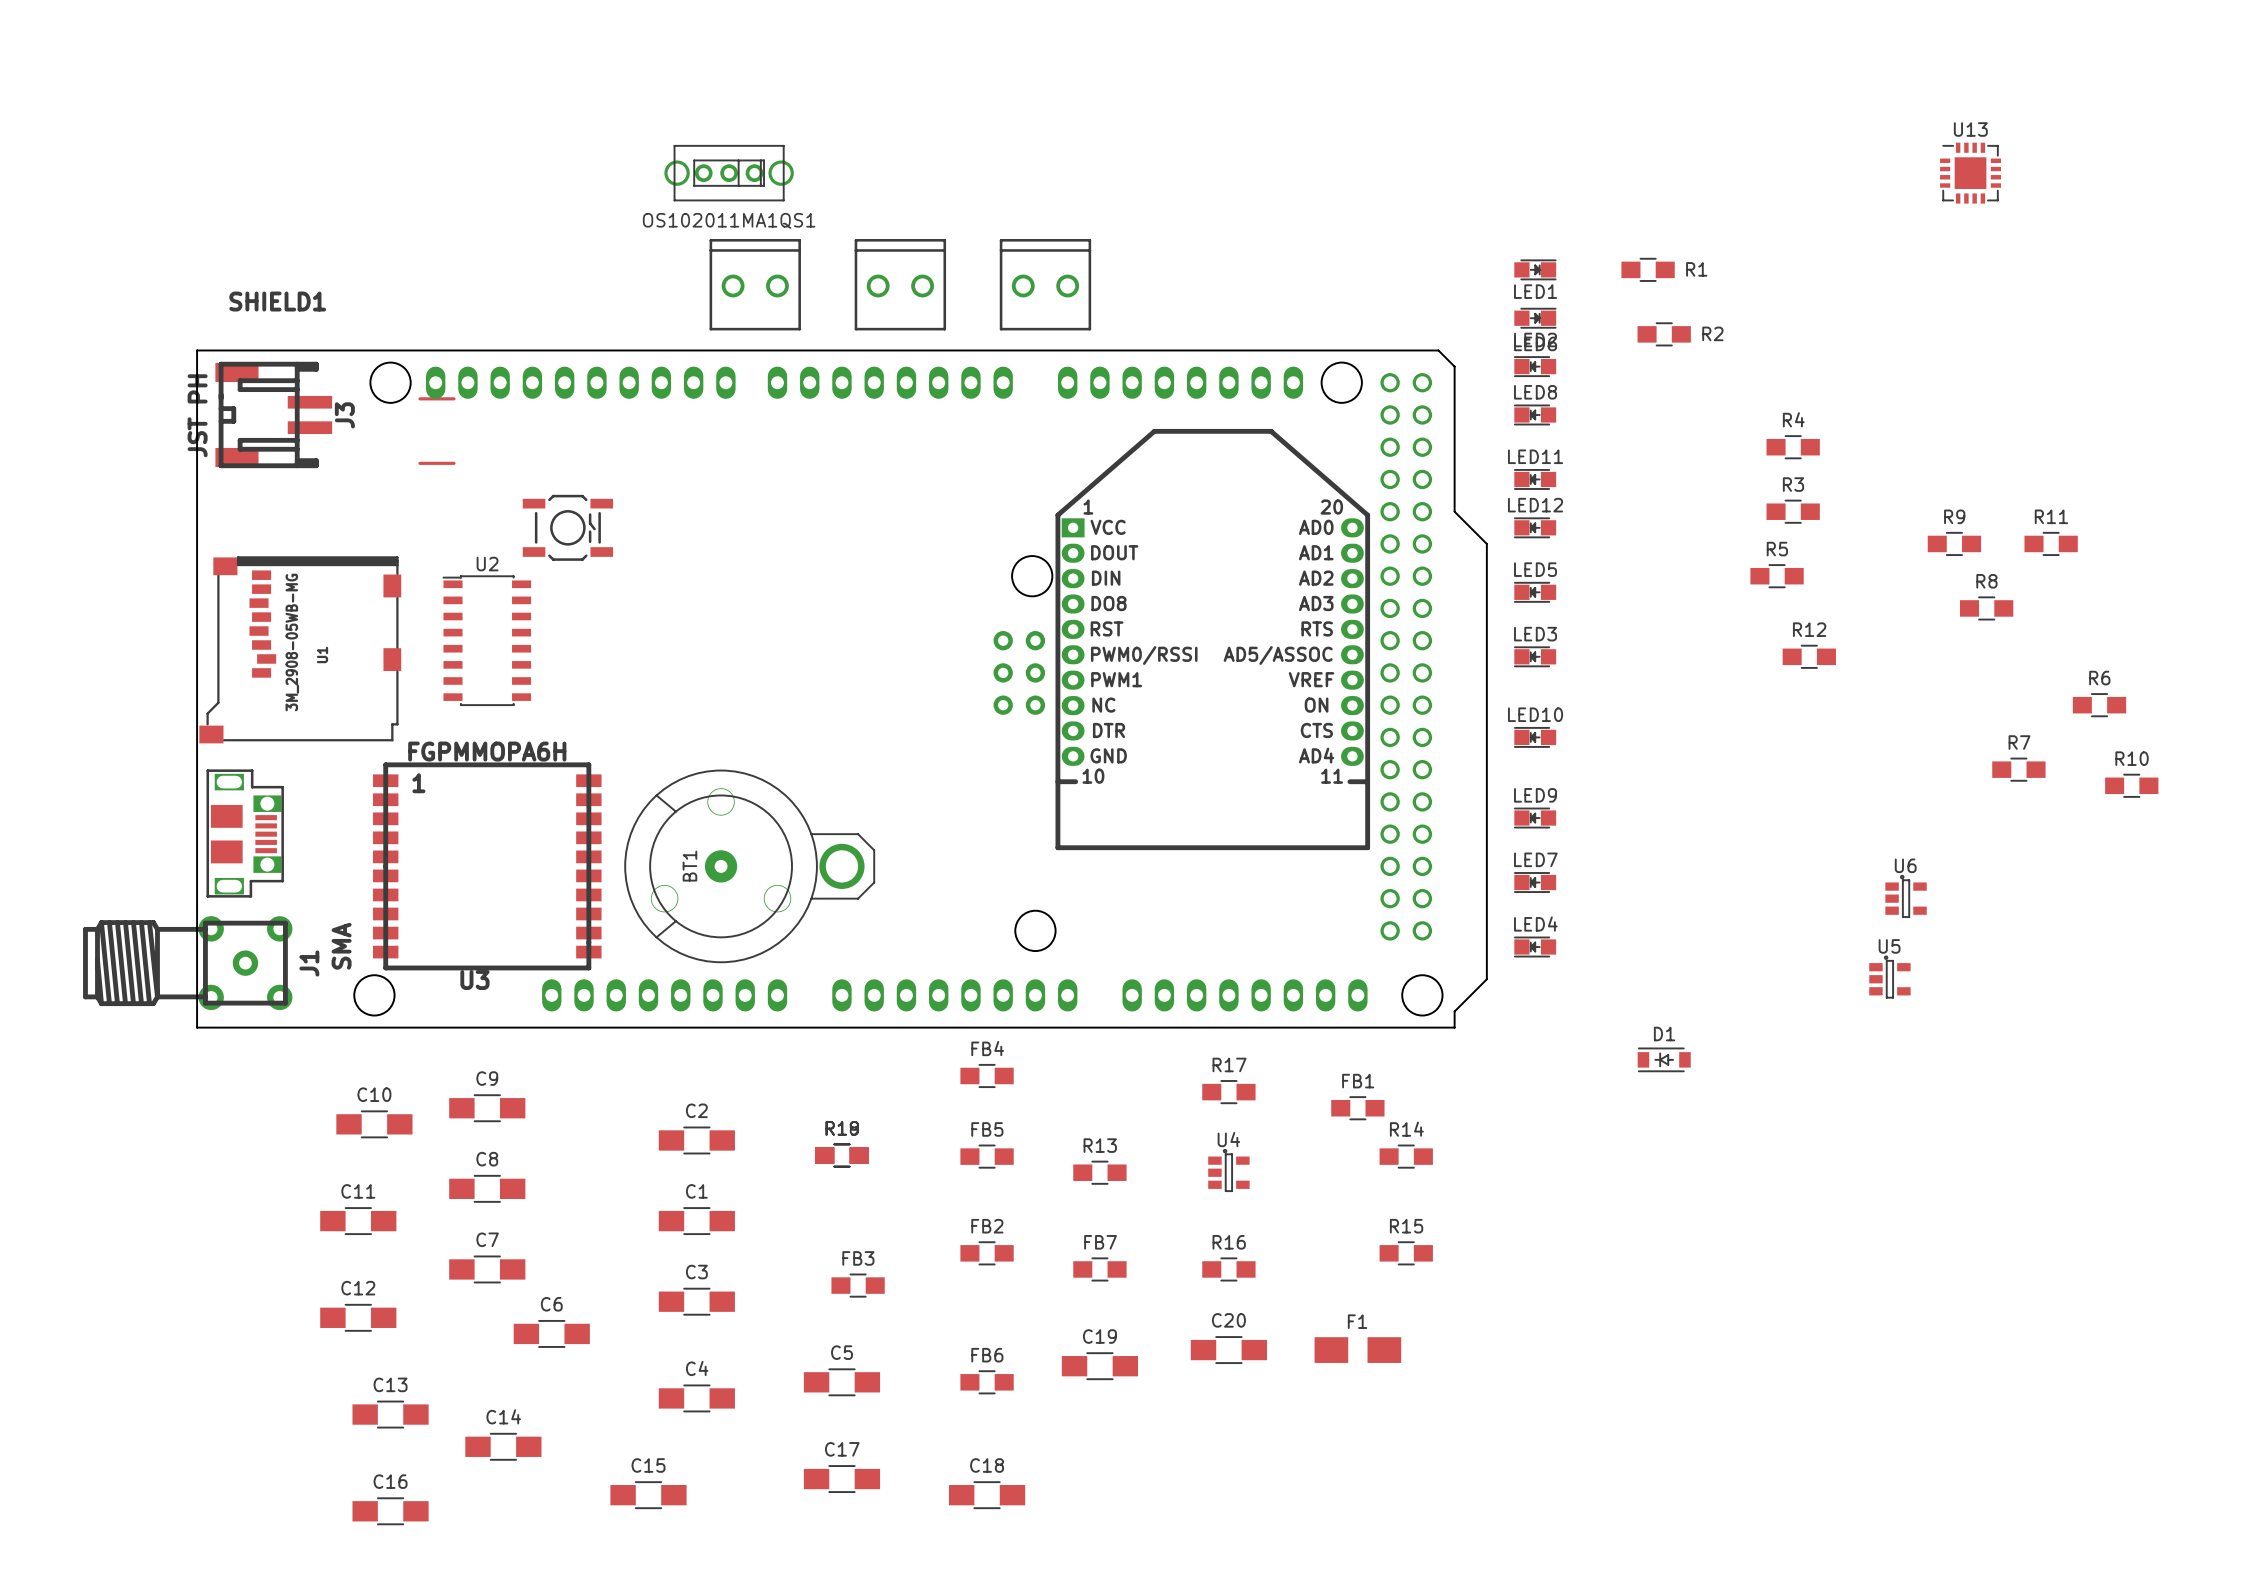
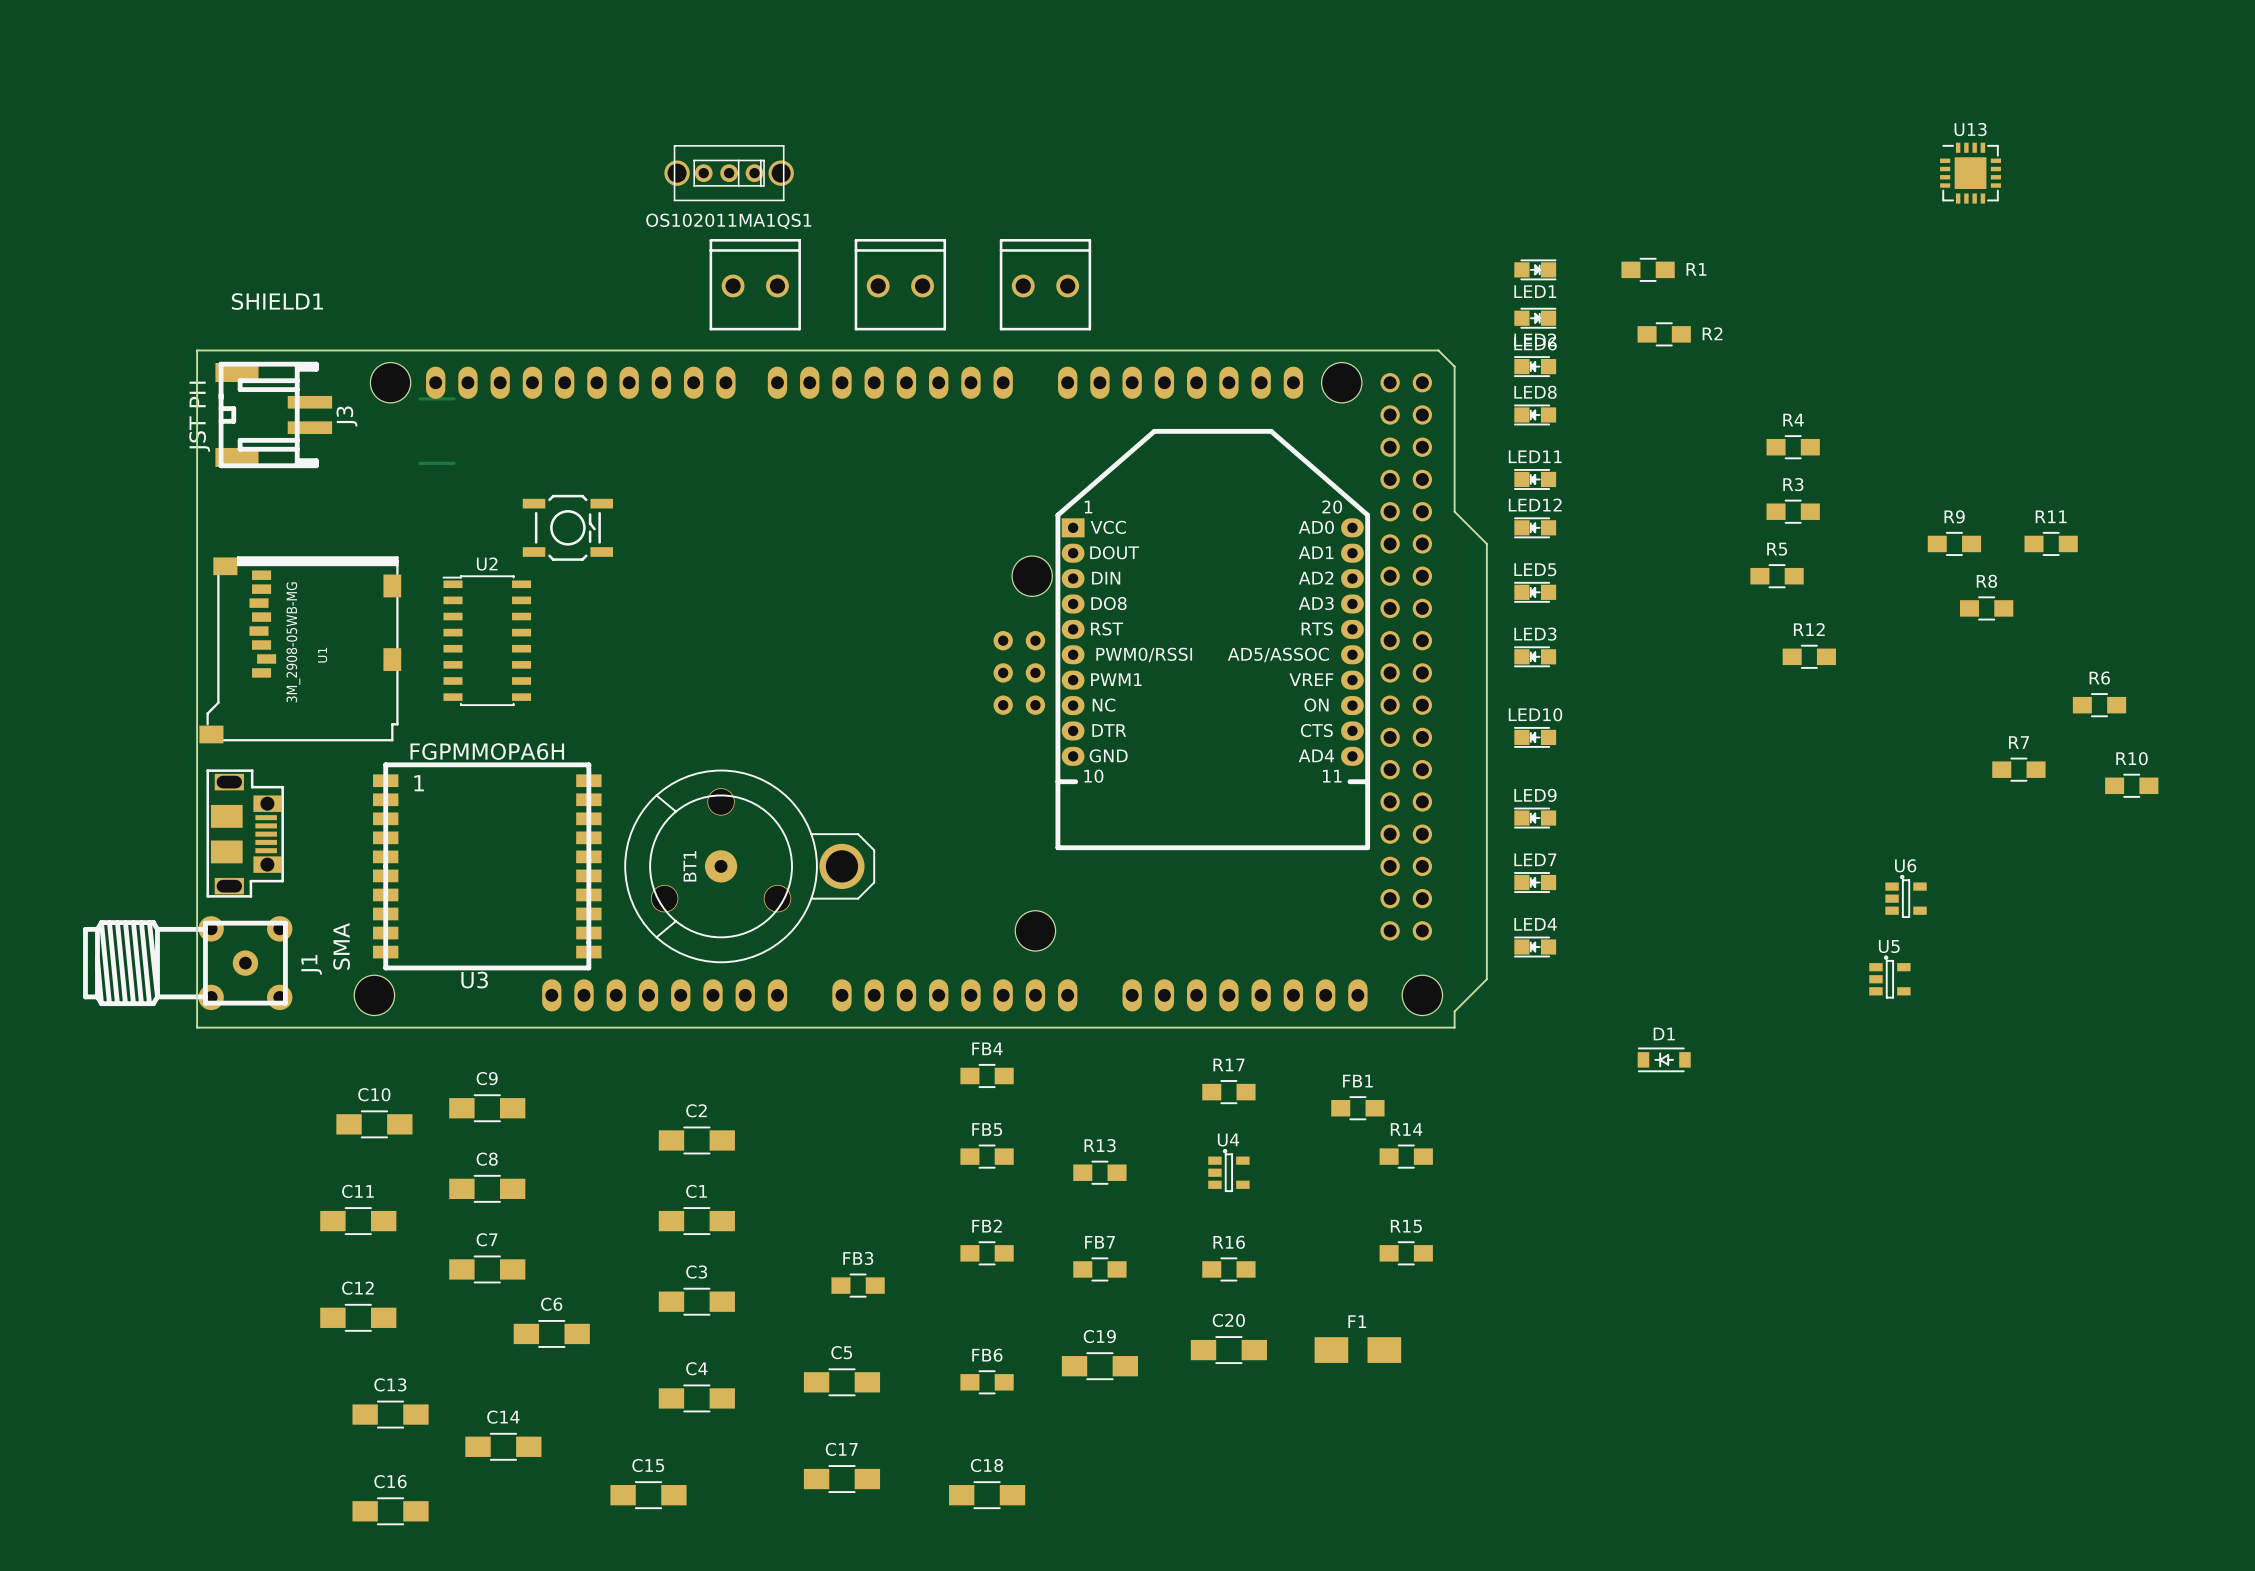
part: (841, 1155) -> none
part: (841, 1155) -> none

